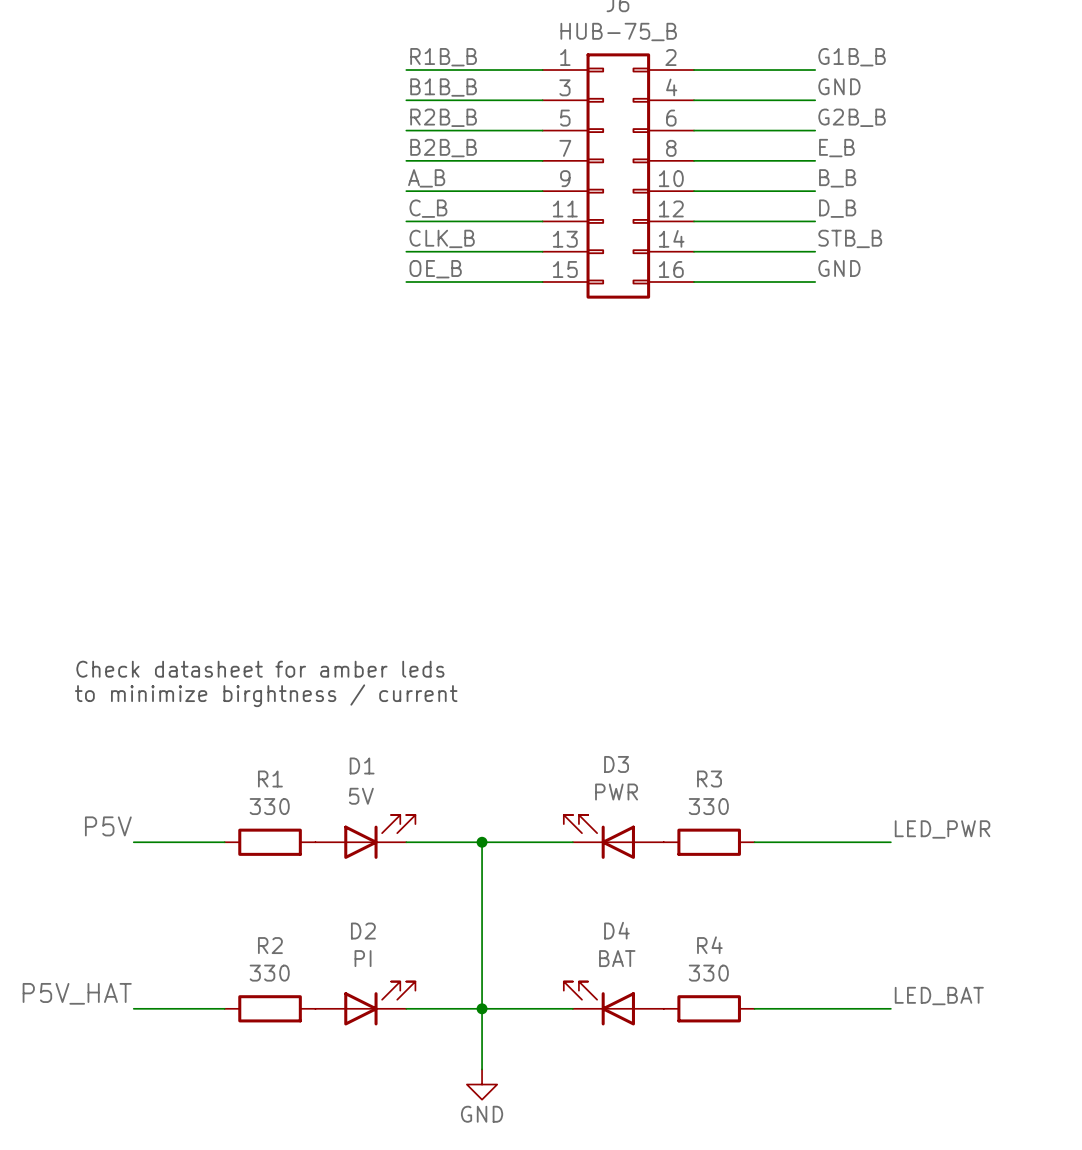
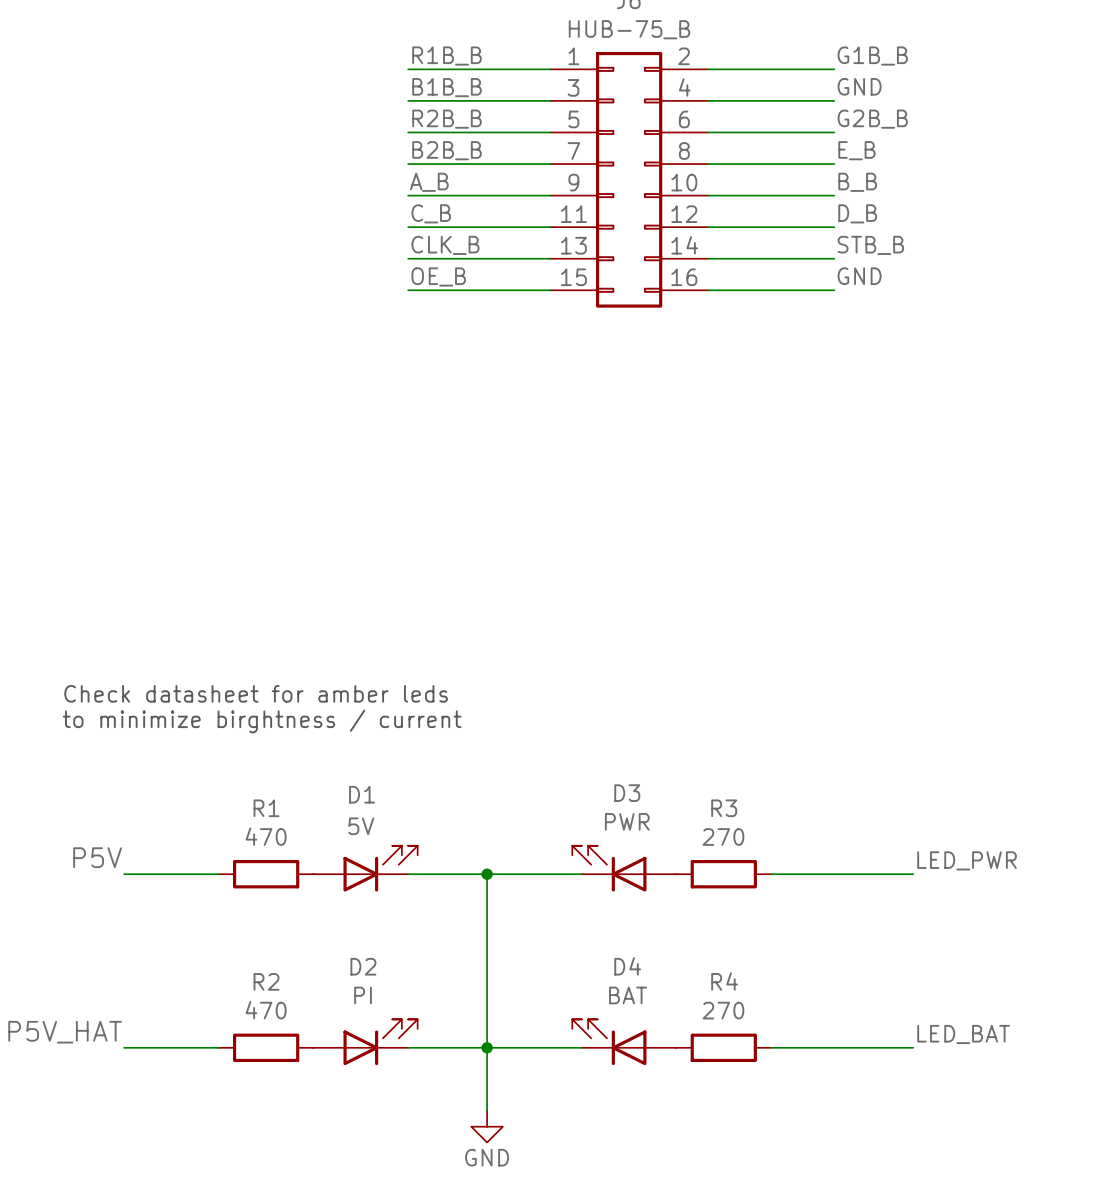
R1 value: 330 (269, 806) -> 470 (266, 836)
R3 value: 330 (708, 806) -> 270 (723, 837)
R2 value: 330 (269, 973) -> 470 (266, 1010)
R4 value: 330 (708, 973) -> 270 (723, 1010)

